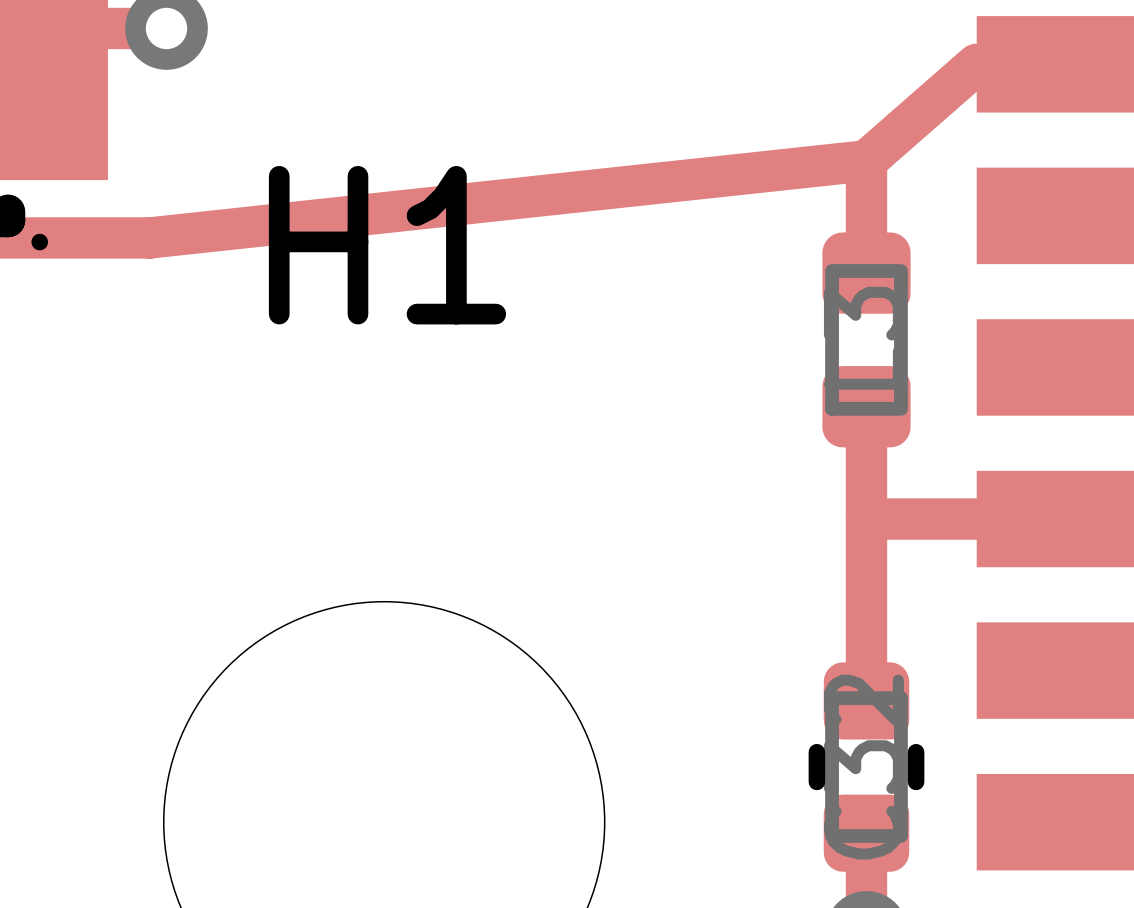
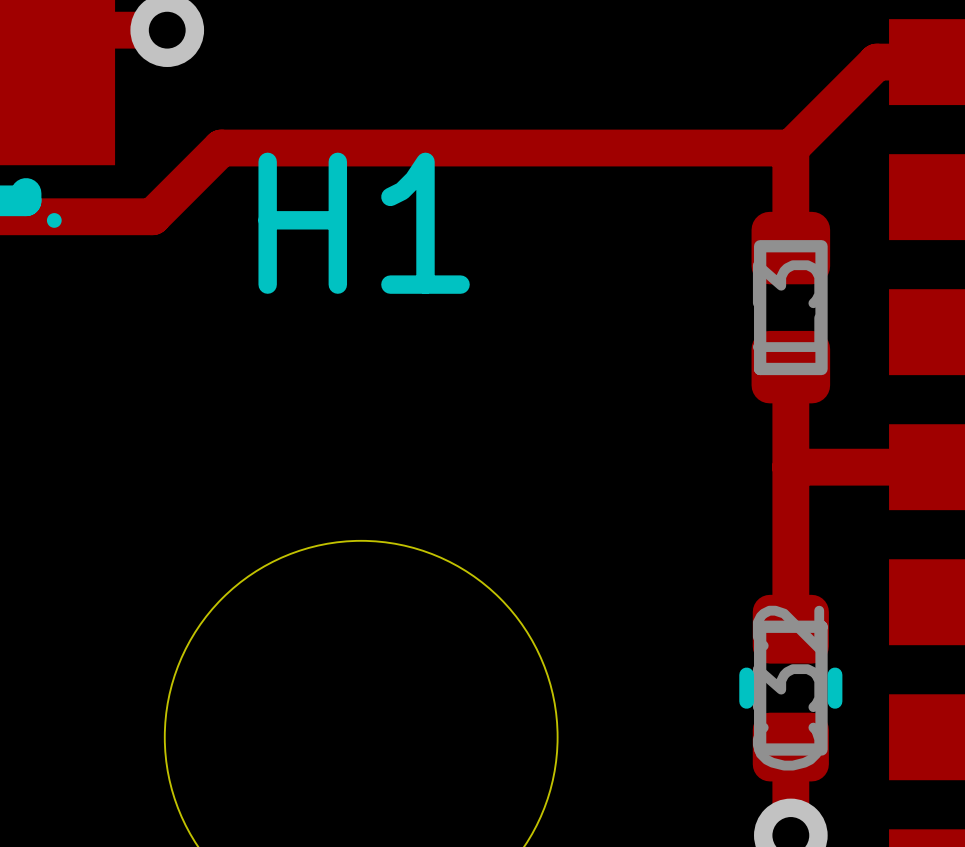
track: (976, 64) (866, 160) (149, 237) -> (889, 62) (876, 62) (790, 148) (221, 148) (152, 216)

